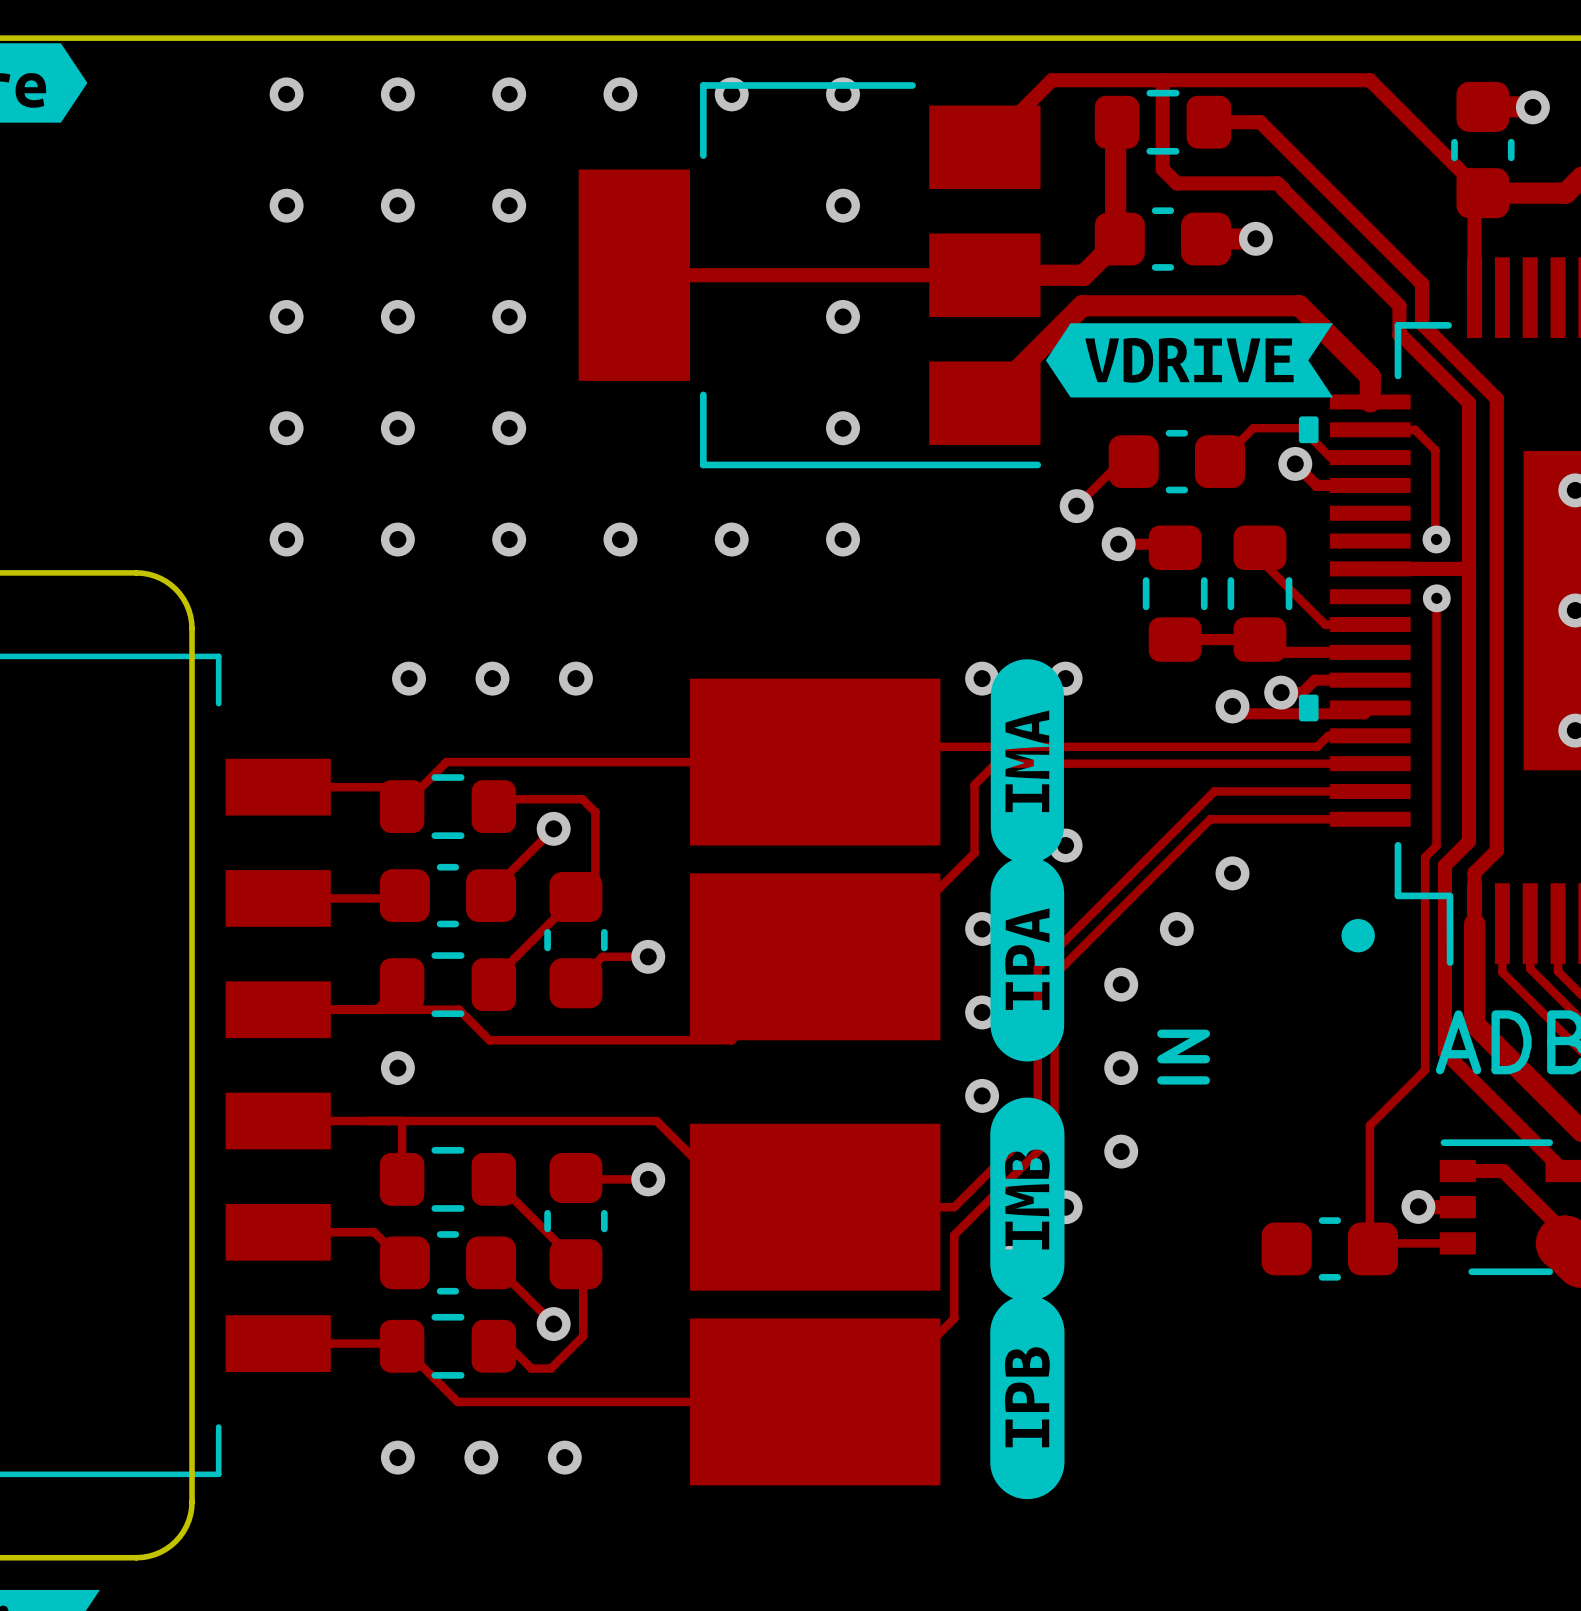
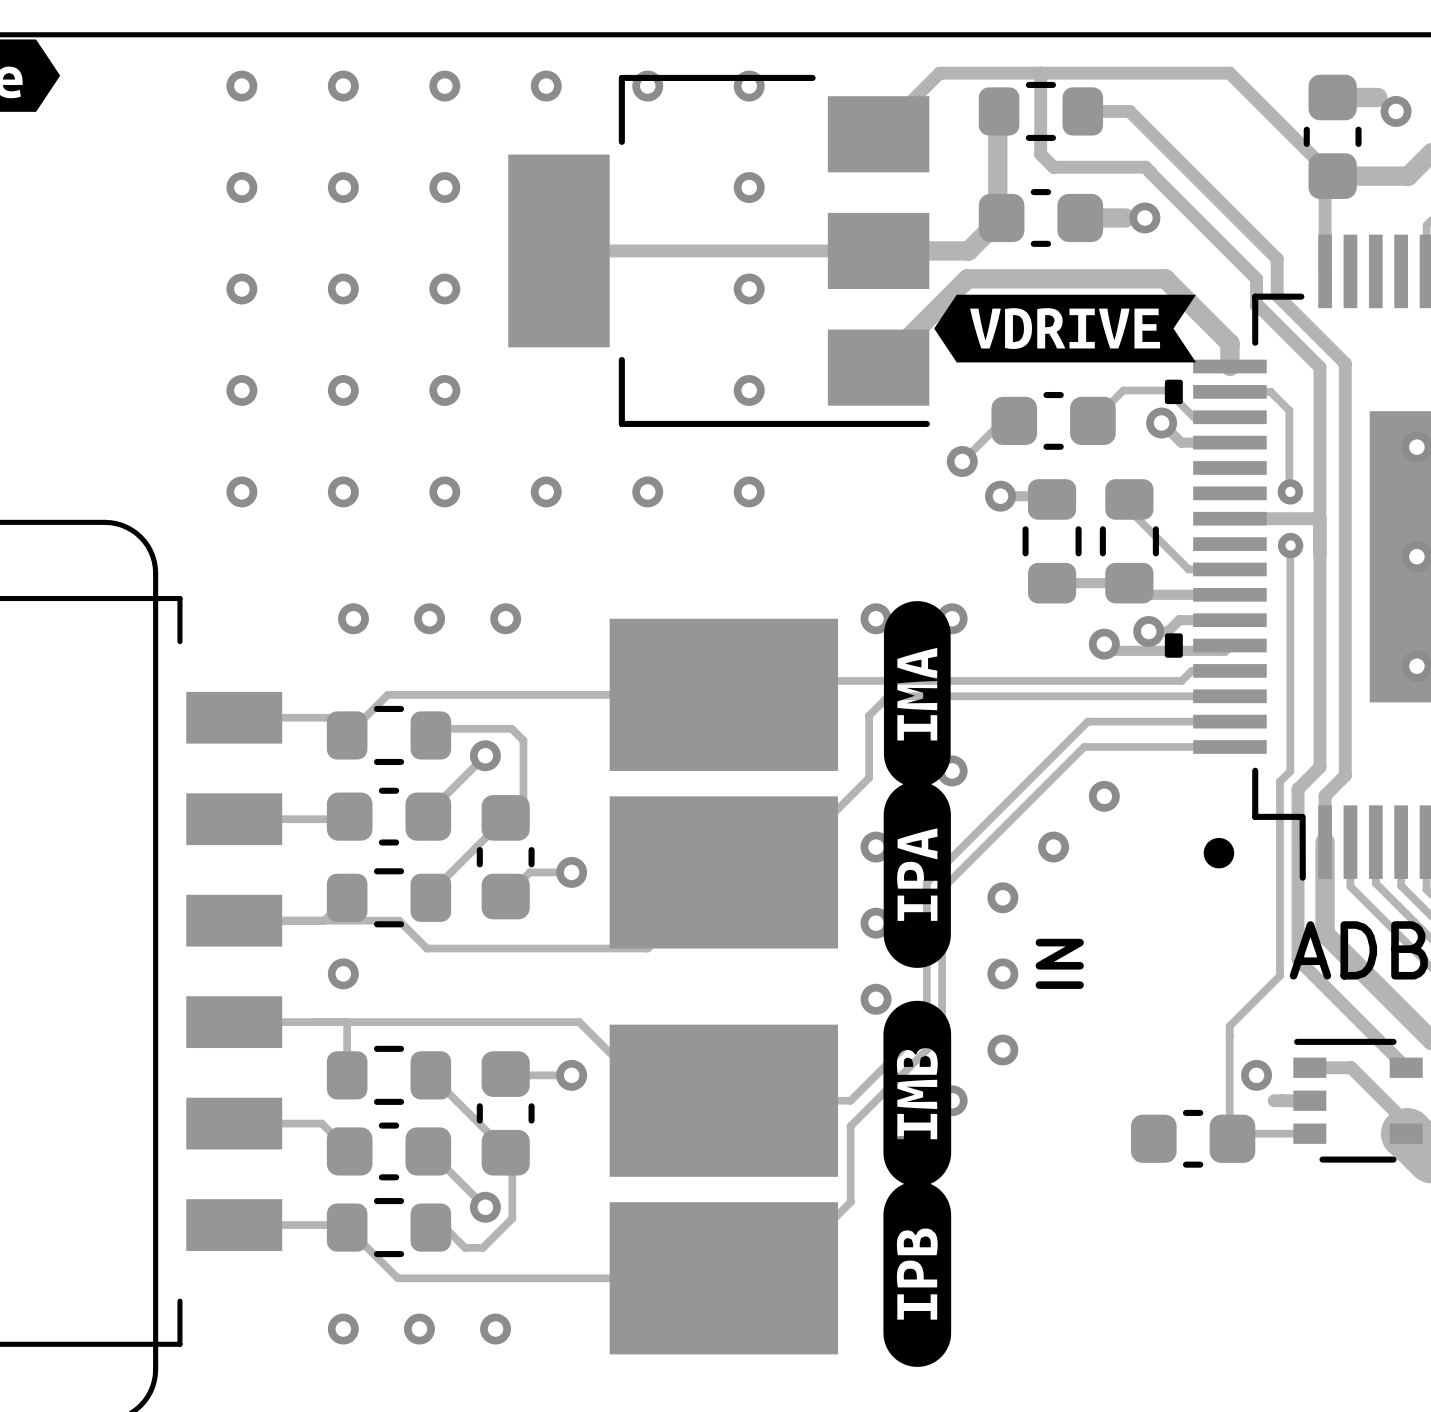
via position: (1532, 107) -> (1396, 111)
via position: (1255, 238) -> (1144, 217)
via position: (1418, 1206) -> (1256, 1075)

